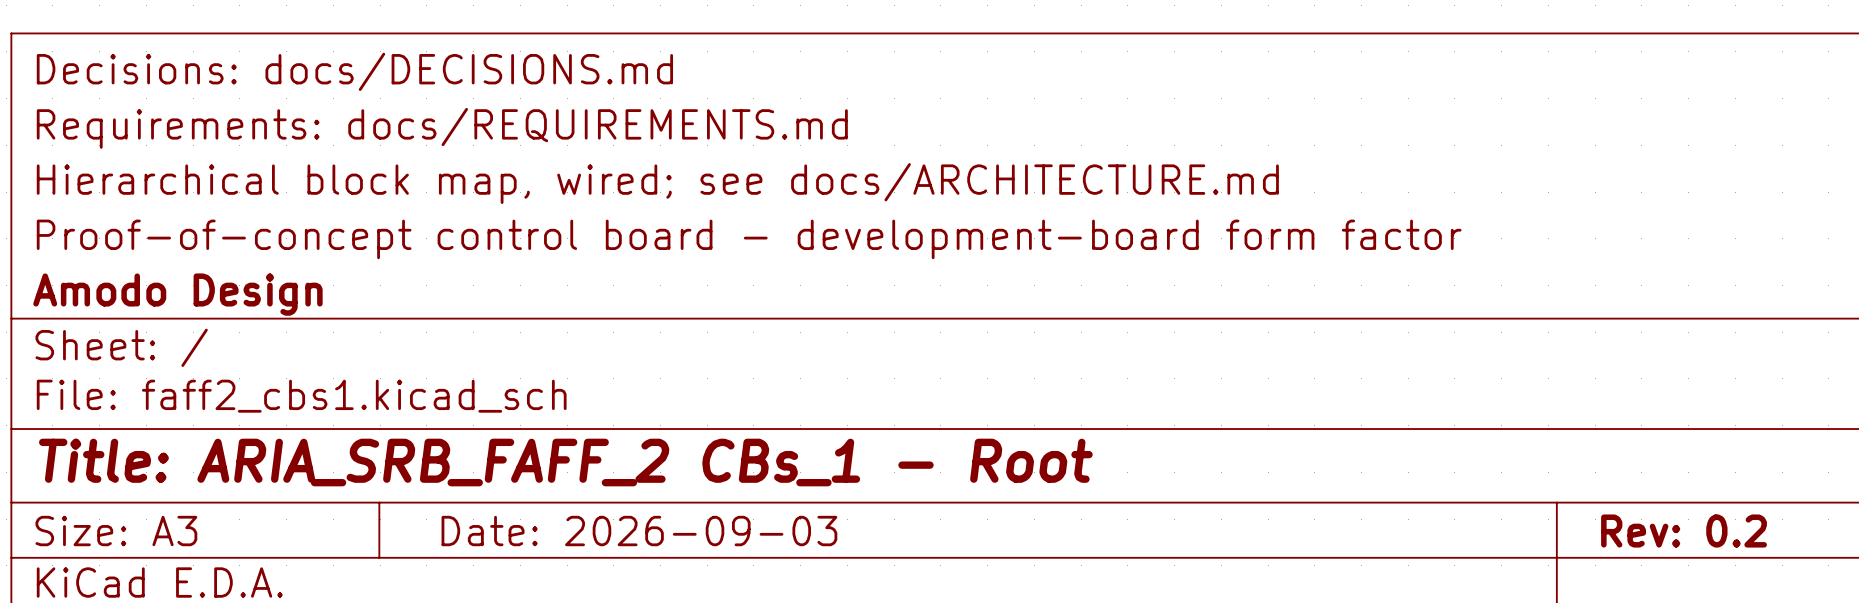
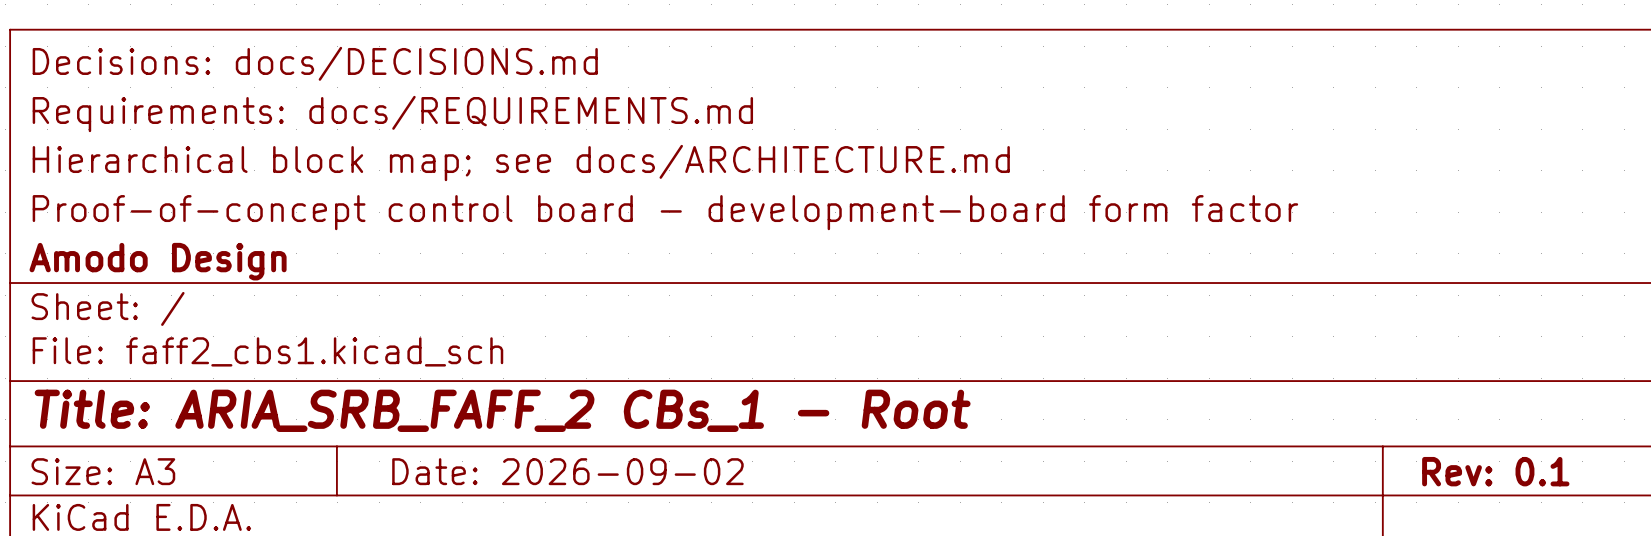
title block: Hierarchical block map, wired; see docs/ARCHITECTURE.md (657, 183) -> Hierarchical block map; see docs/ARCHITECTURE.md (521, 163)
title block: Date: 2026-09-03 (639, 531) -> Date: 2026-09-02 (567, 471)
title block: Rev: 0.2 (1684, 531) -> Rev: 0.1 (1495, 471)

